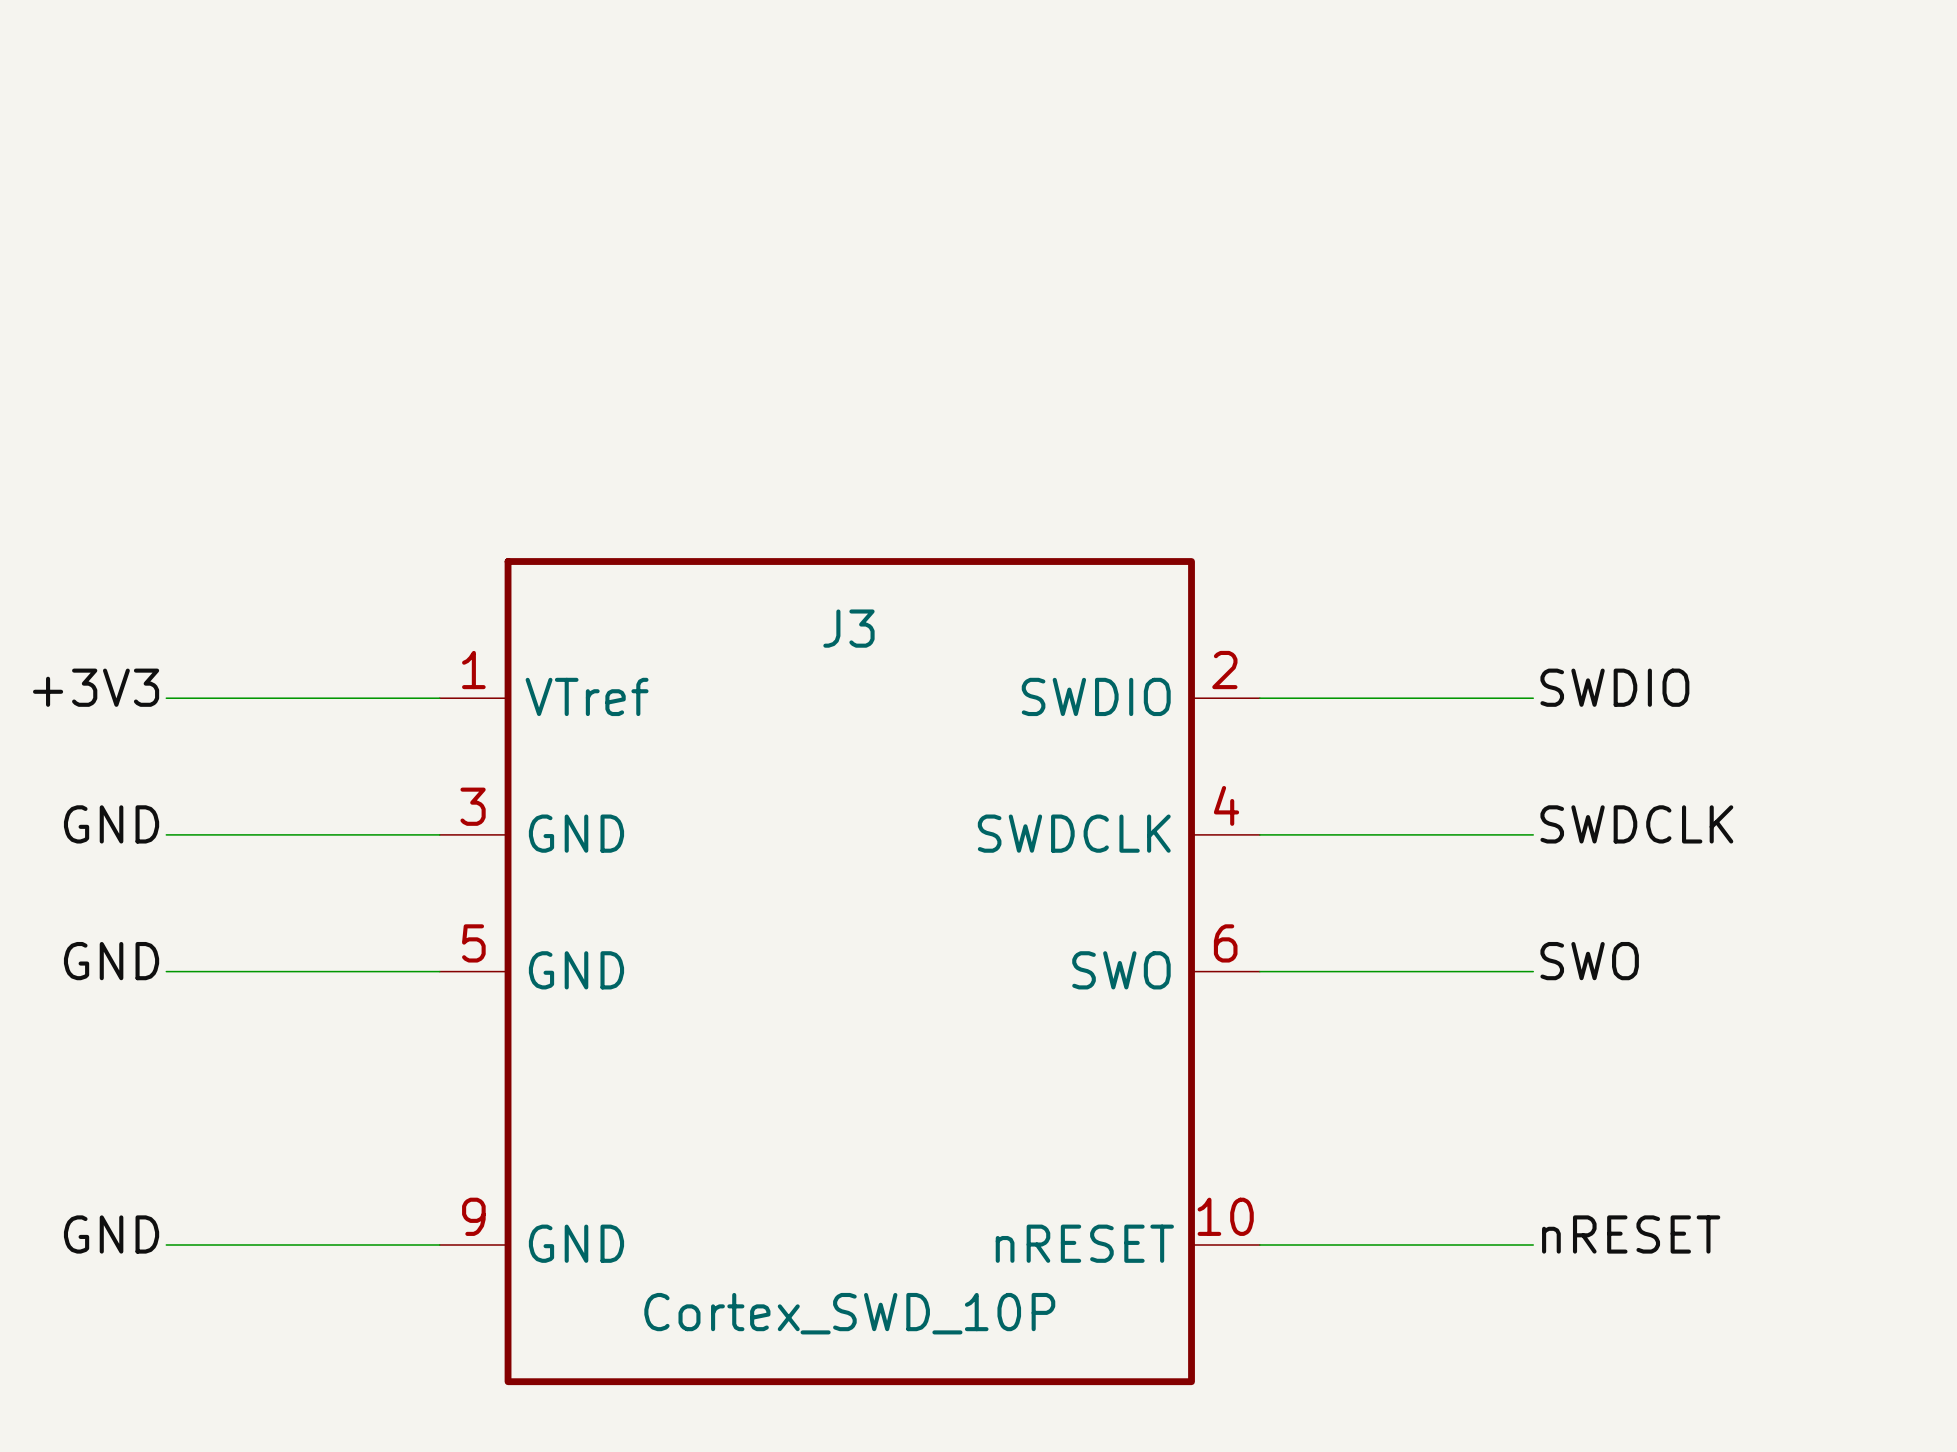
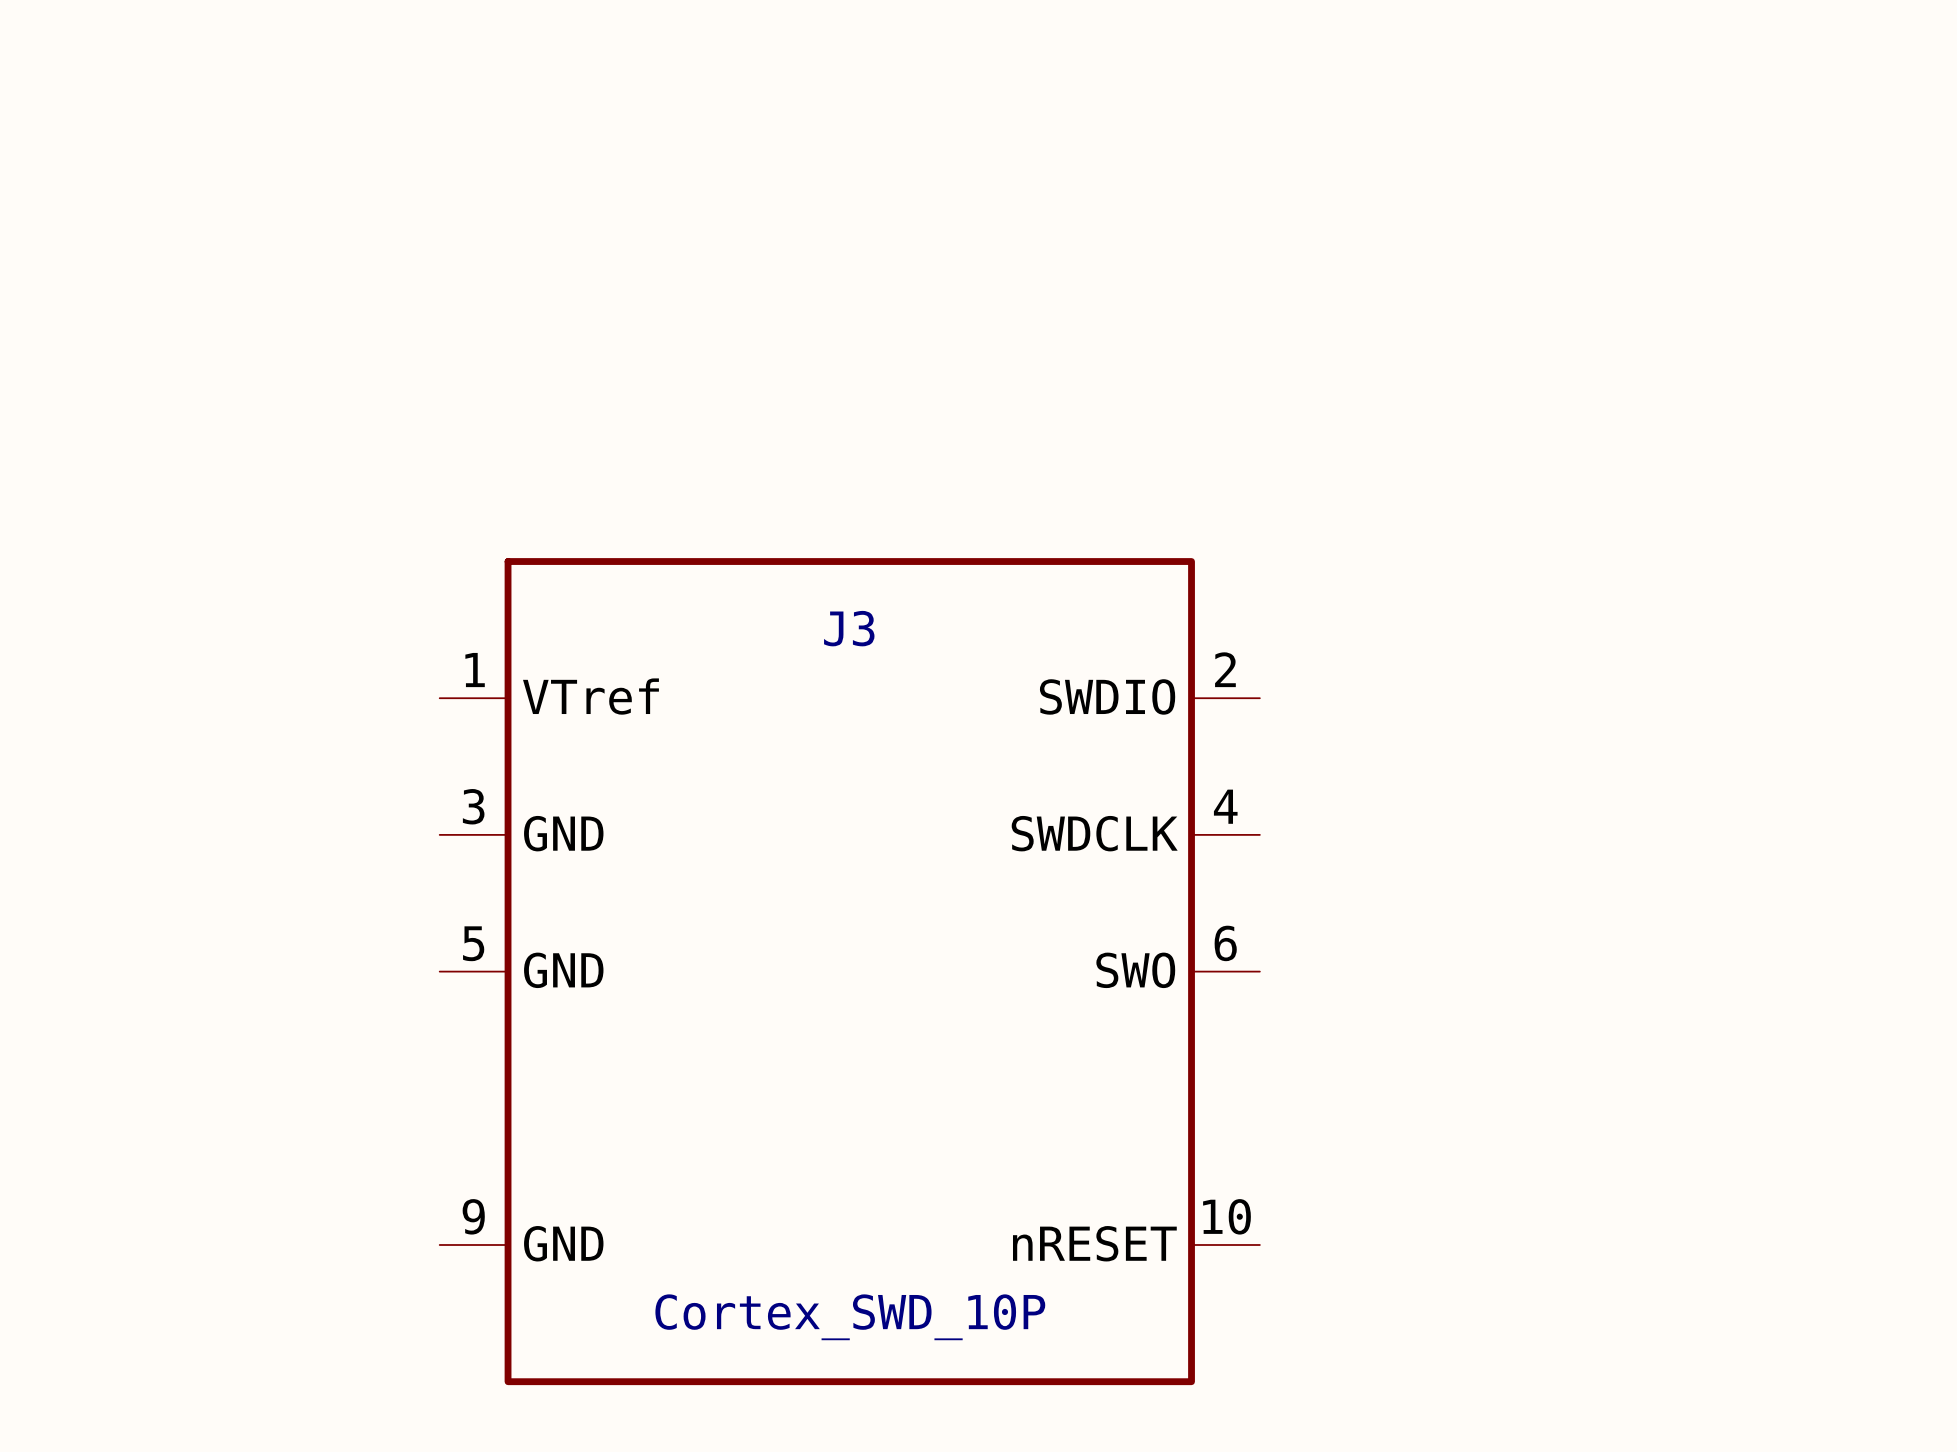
label: +3V3 (96, 687) -> none
label: SWDIO (1614, 687) -> none
wire: (166, 698) (439, 698) -> none
wire: (1259, 698) (1533, 698) -> none
label: GND (111, 824) -> none
label: SWDCLK (1636, 824) -> none
wire: (166, 834) (439, 834) -> none
wire: (1259, 834) (1533, 834) -> none
label: GND (111, 961) -> none
label: SWO (1589, 961) -> none
wire: (166, 971) (439, 971) -> none
wire: (1259, 971) (1533, 971) -> none
label: GND (111, 1234) -> none
label: nRESET (1631, 1234) -> none
wire: (166, 1244) (439, 1244) -> none
wire: (1259, 1244) (1533, 1244) -> none

